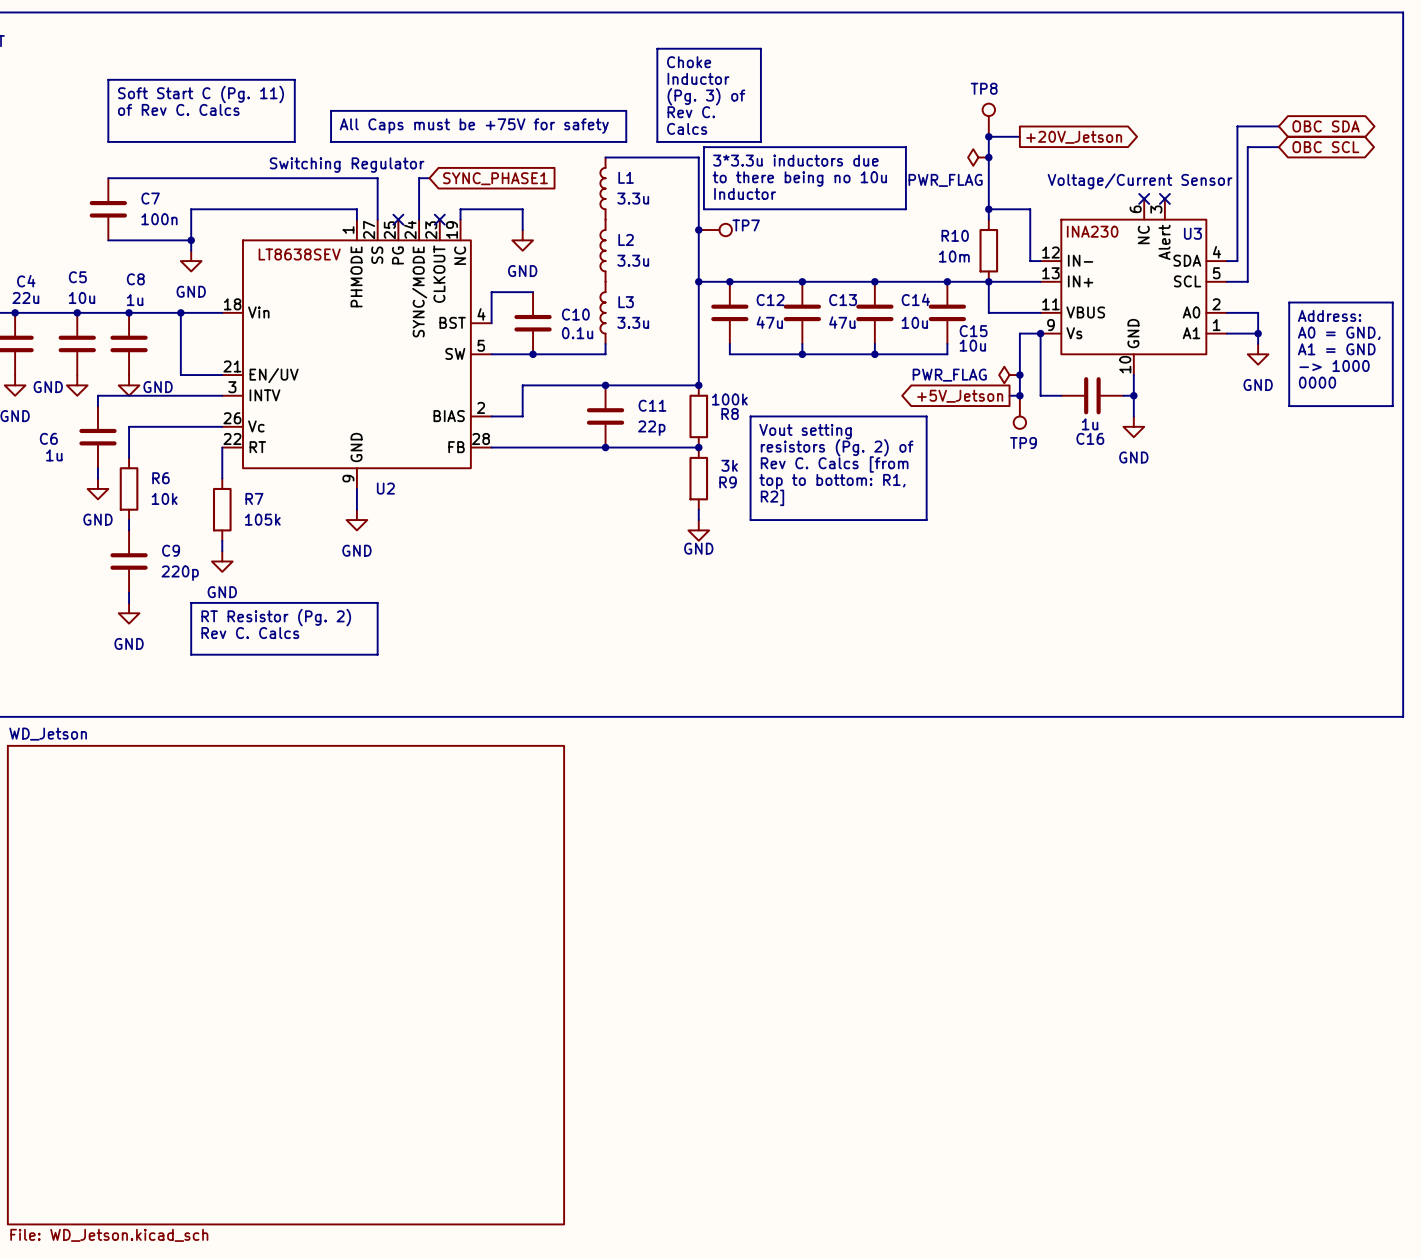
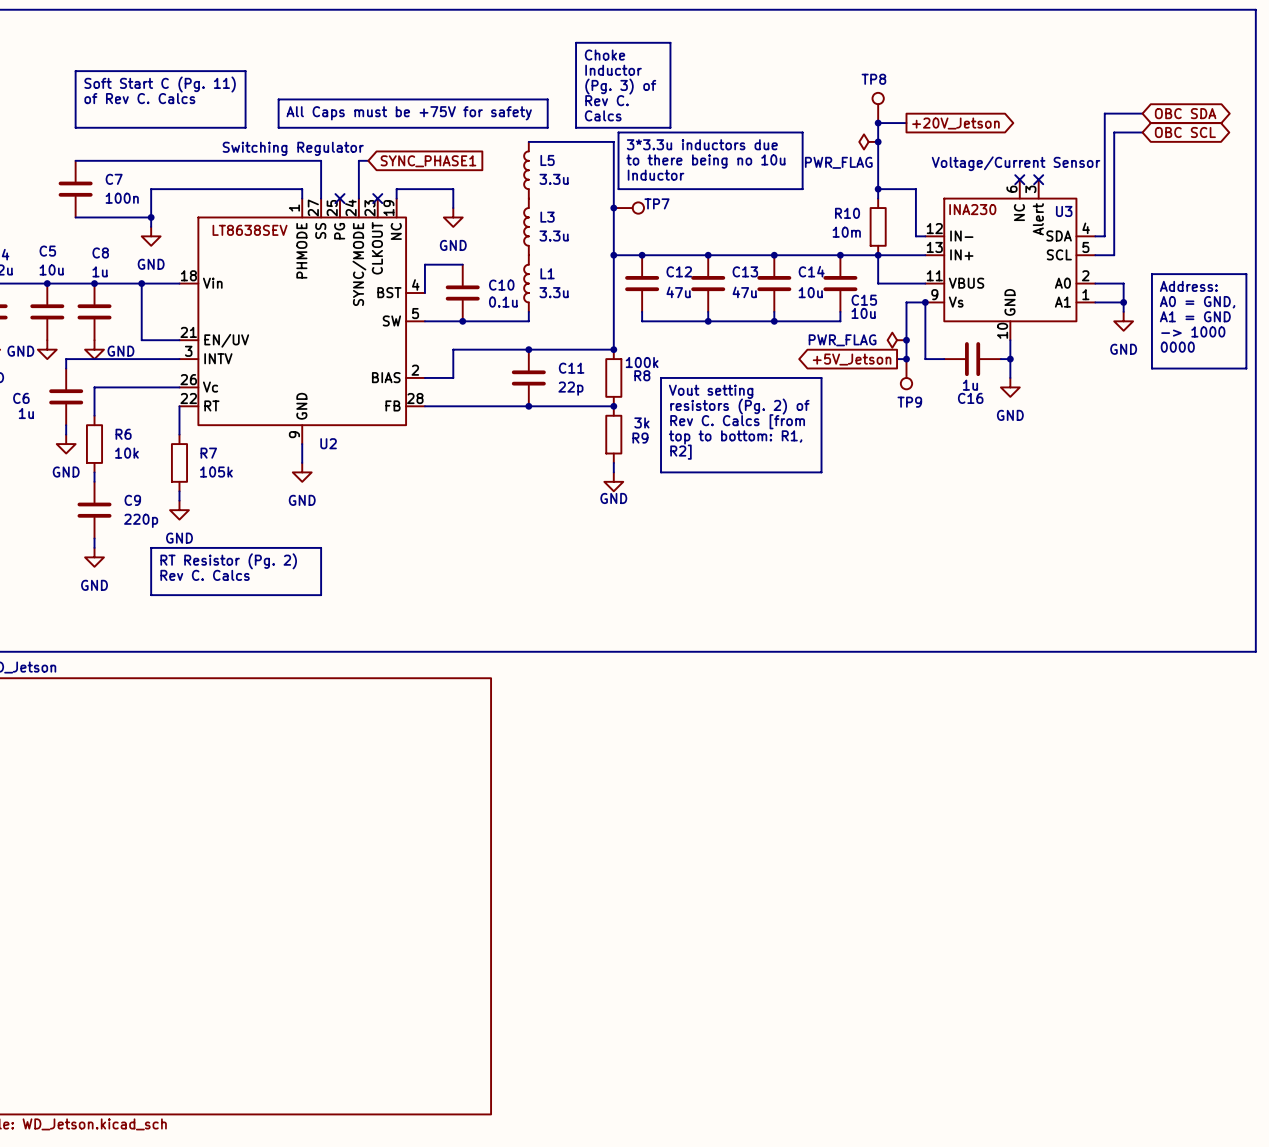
L1 name: L1 (626, 177) -> L5 (547, 160)
L2 name: L2 (626, 239) -> L3 (547, 217)
L3 name: L3 (626, 302) -> L1 (547, 273)

